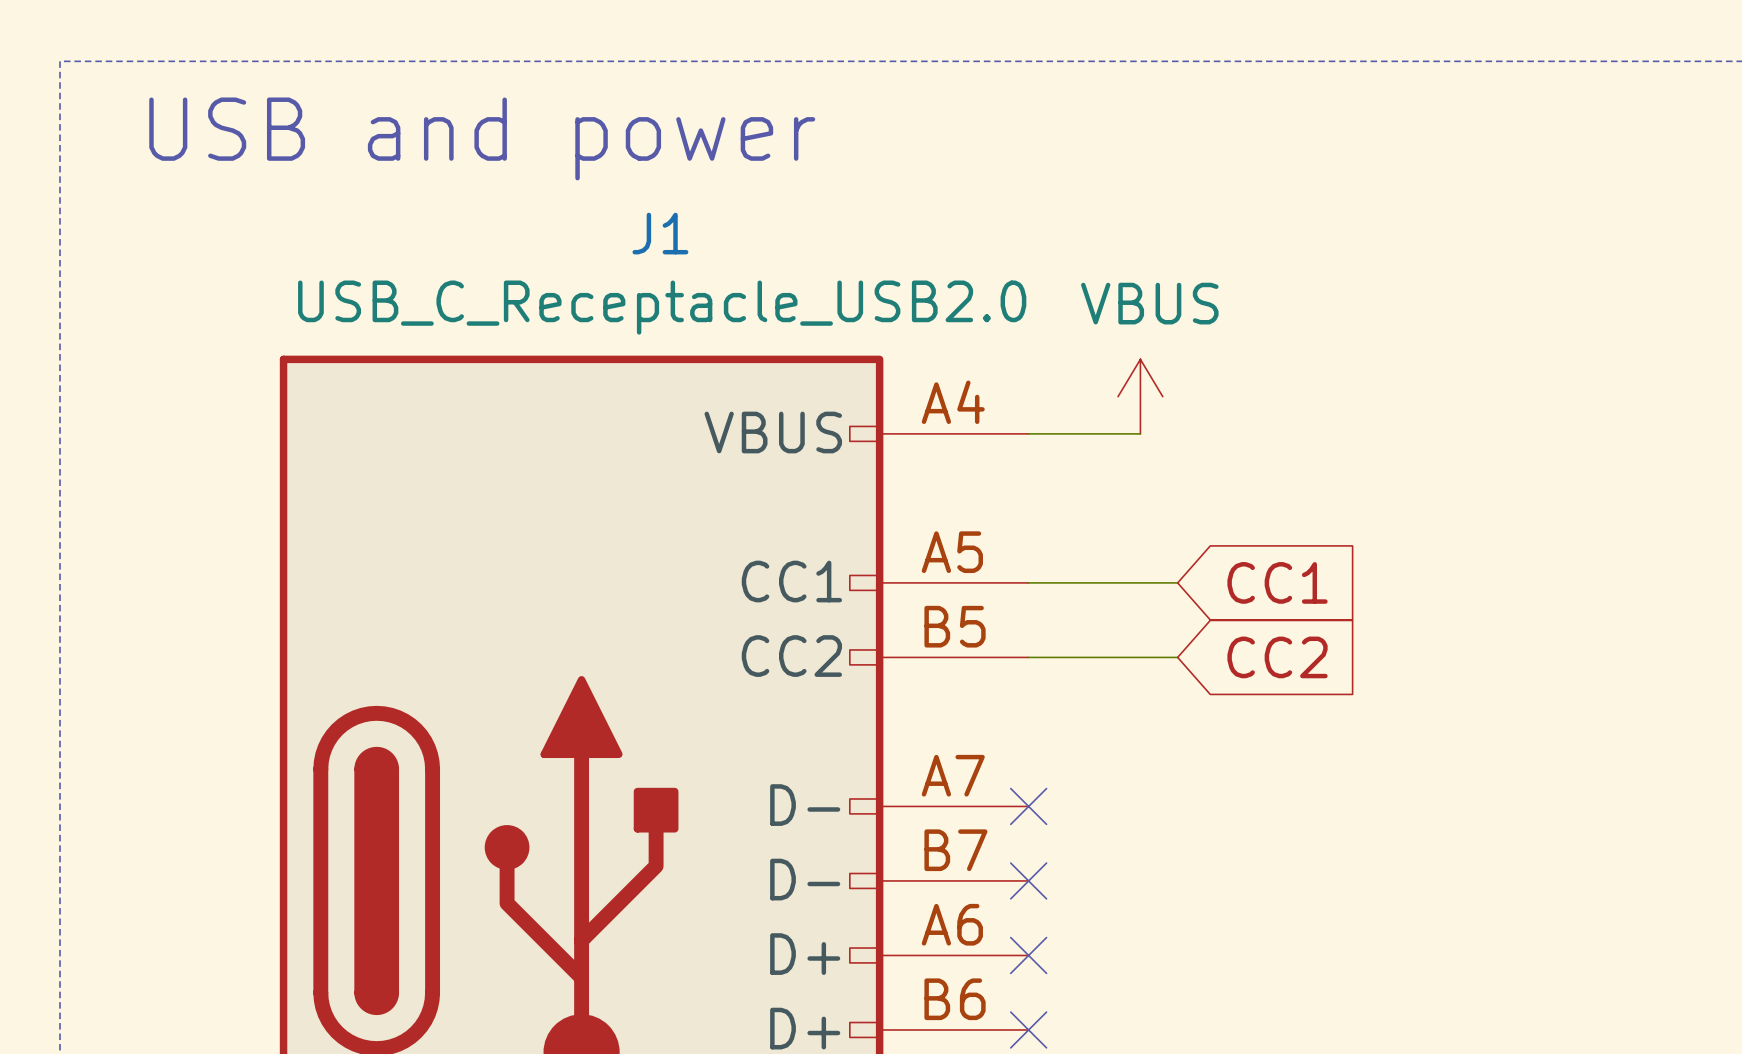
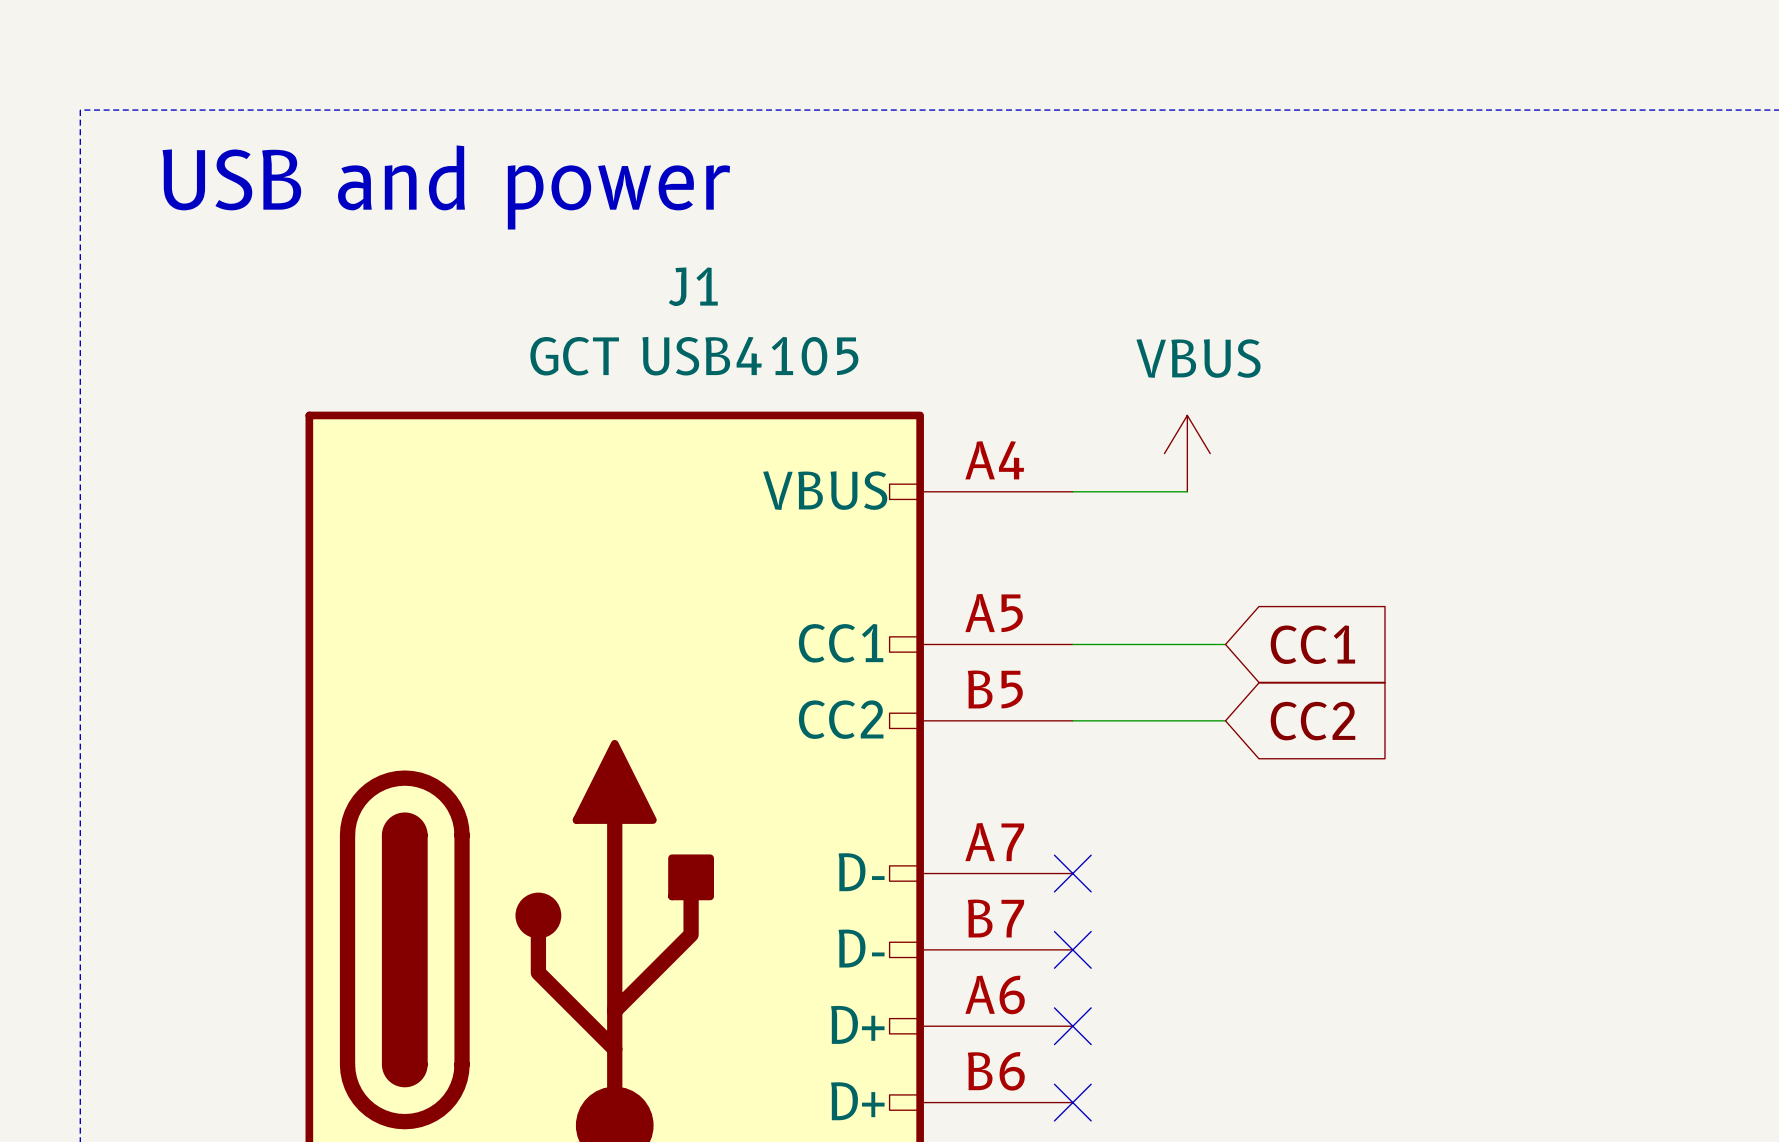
J1 value: USB_C_Receptacle_USB2.0 (662, 307) -> GCT USB4105 (694, 356)

